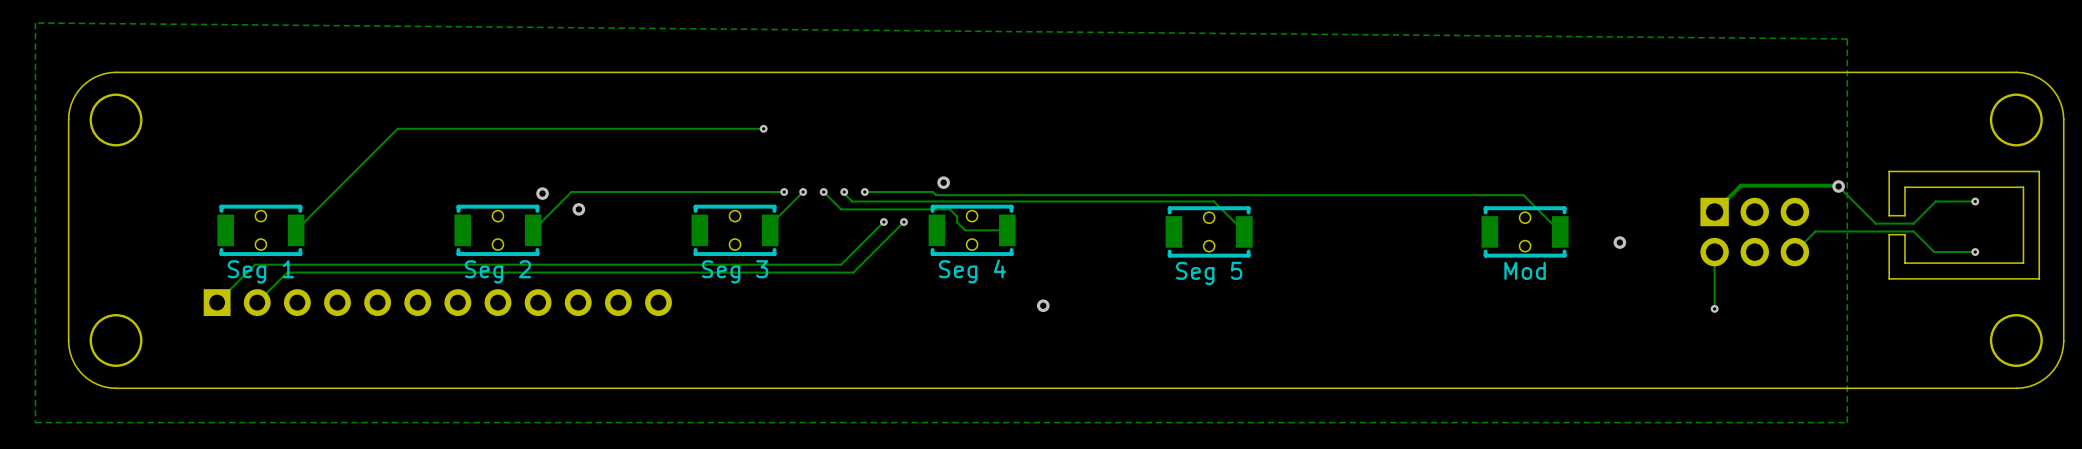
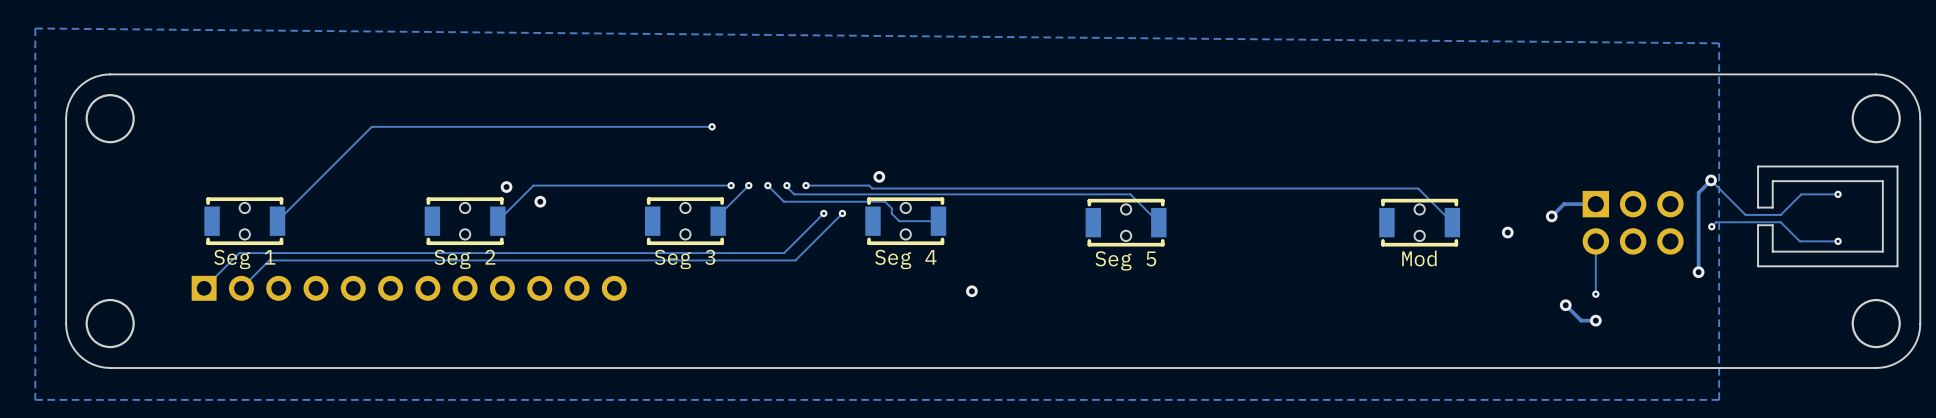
track: (1837, 185) (1740, 185) (1714, 211) -> (1551, 216) (1564, 204) (1595, 204)
track: none -> (1711, 180) (1698, 192) (1698, 272)
via: none -> (1551, 216)
track: (1844, 231) (1815, 231) (1794, 252) -> (1716, 222) (1711, 226)
via: none -> (1711, 226)
via: none -> (1698, 272)
track: none -> (1565, 305) (1581, 320) (1595, 320)
via: none -> (1565, 305)
via: none -> (1595, 320)

